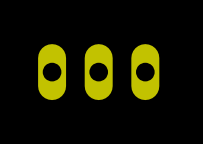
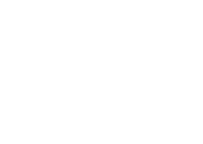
part: (98, 72) -> none

